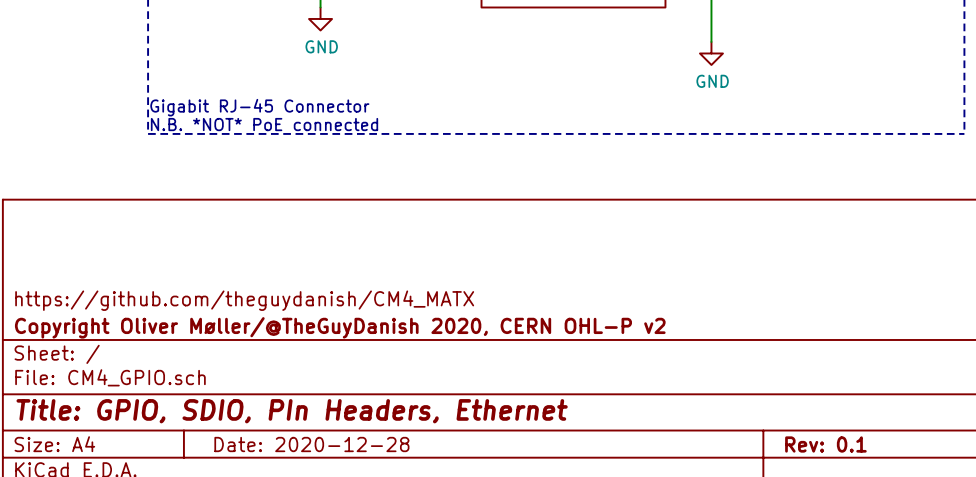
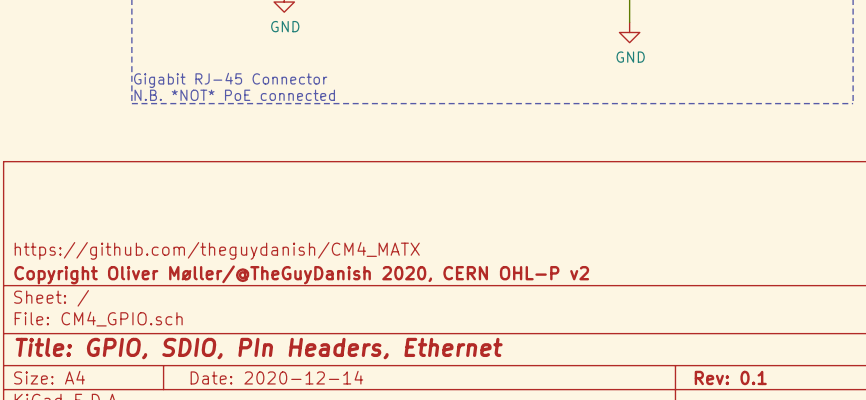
title block: Date: 2020-12-28 (311, 444) -> Date: 2020-12-14 (276, 377)

